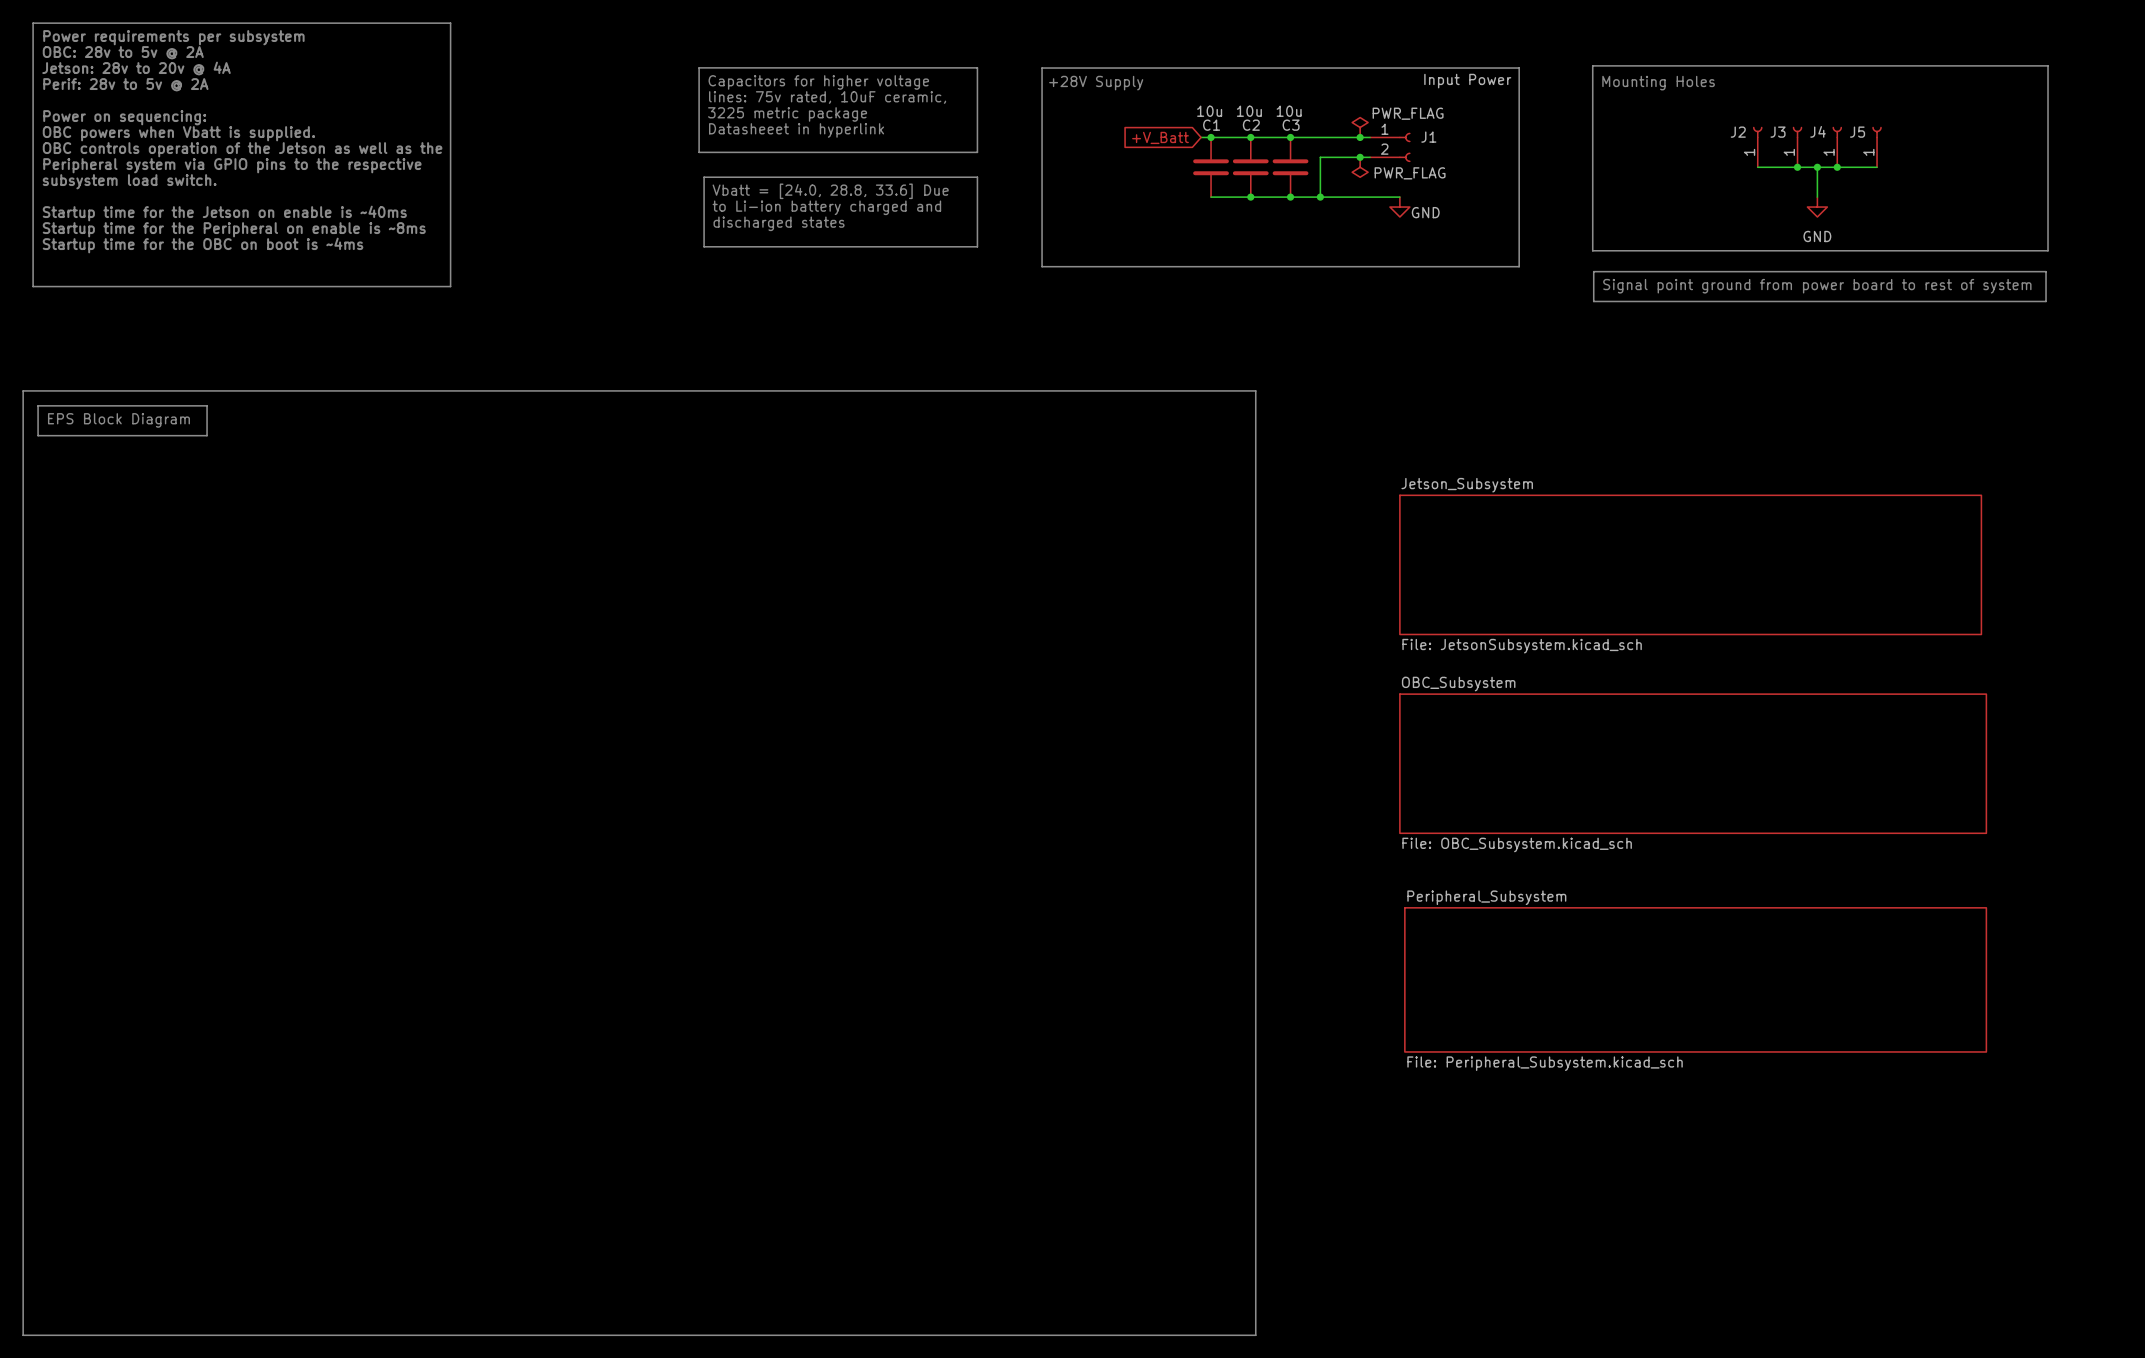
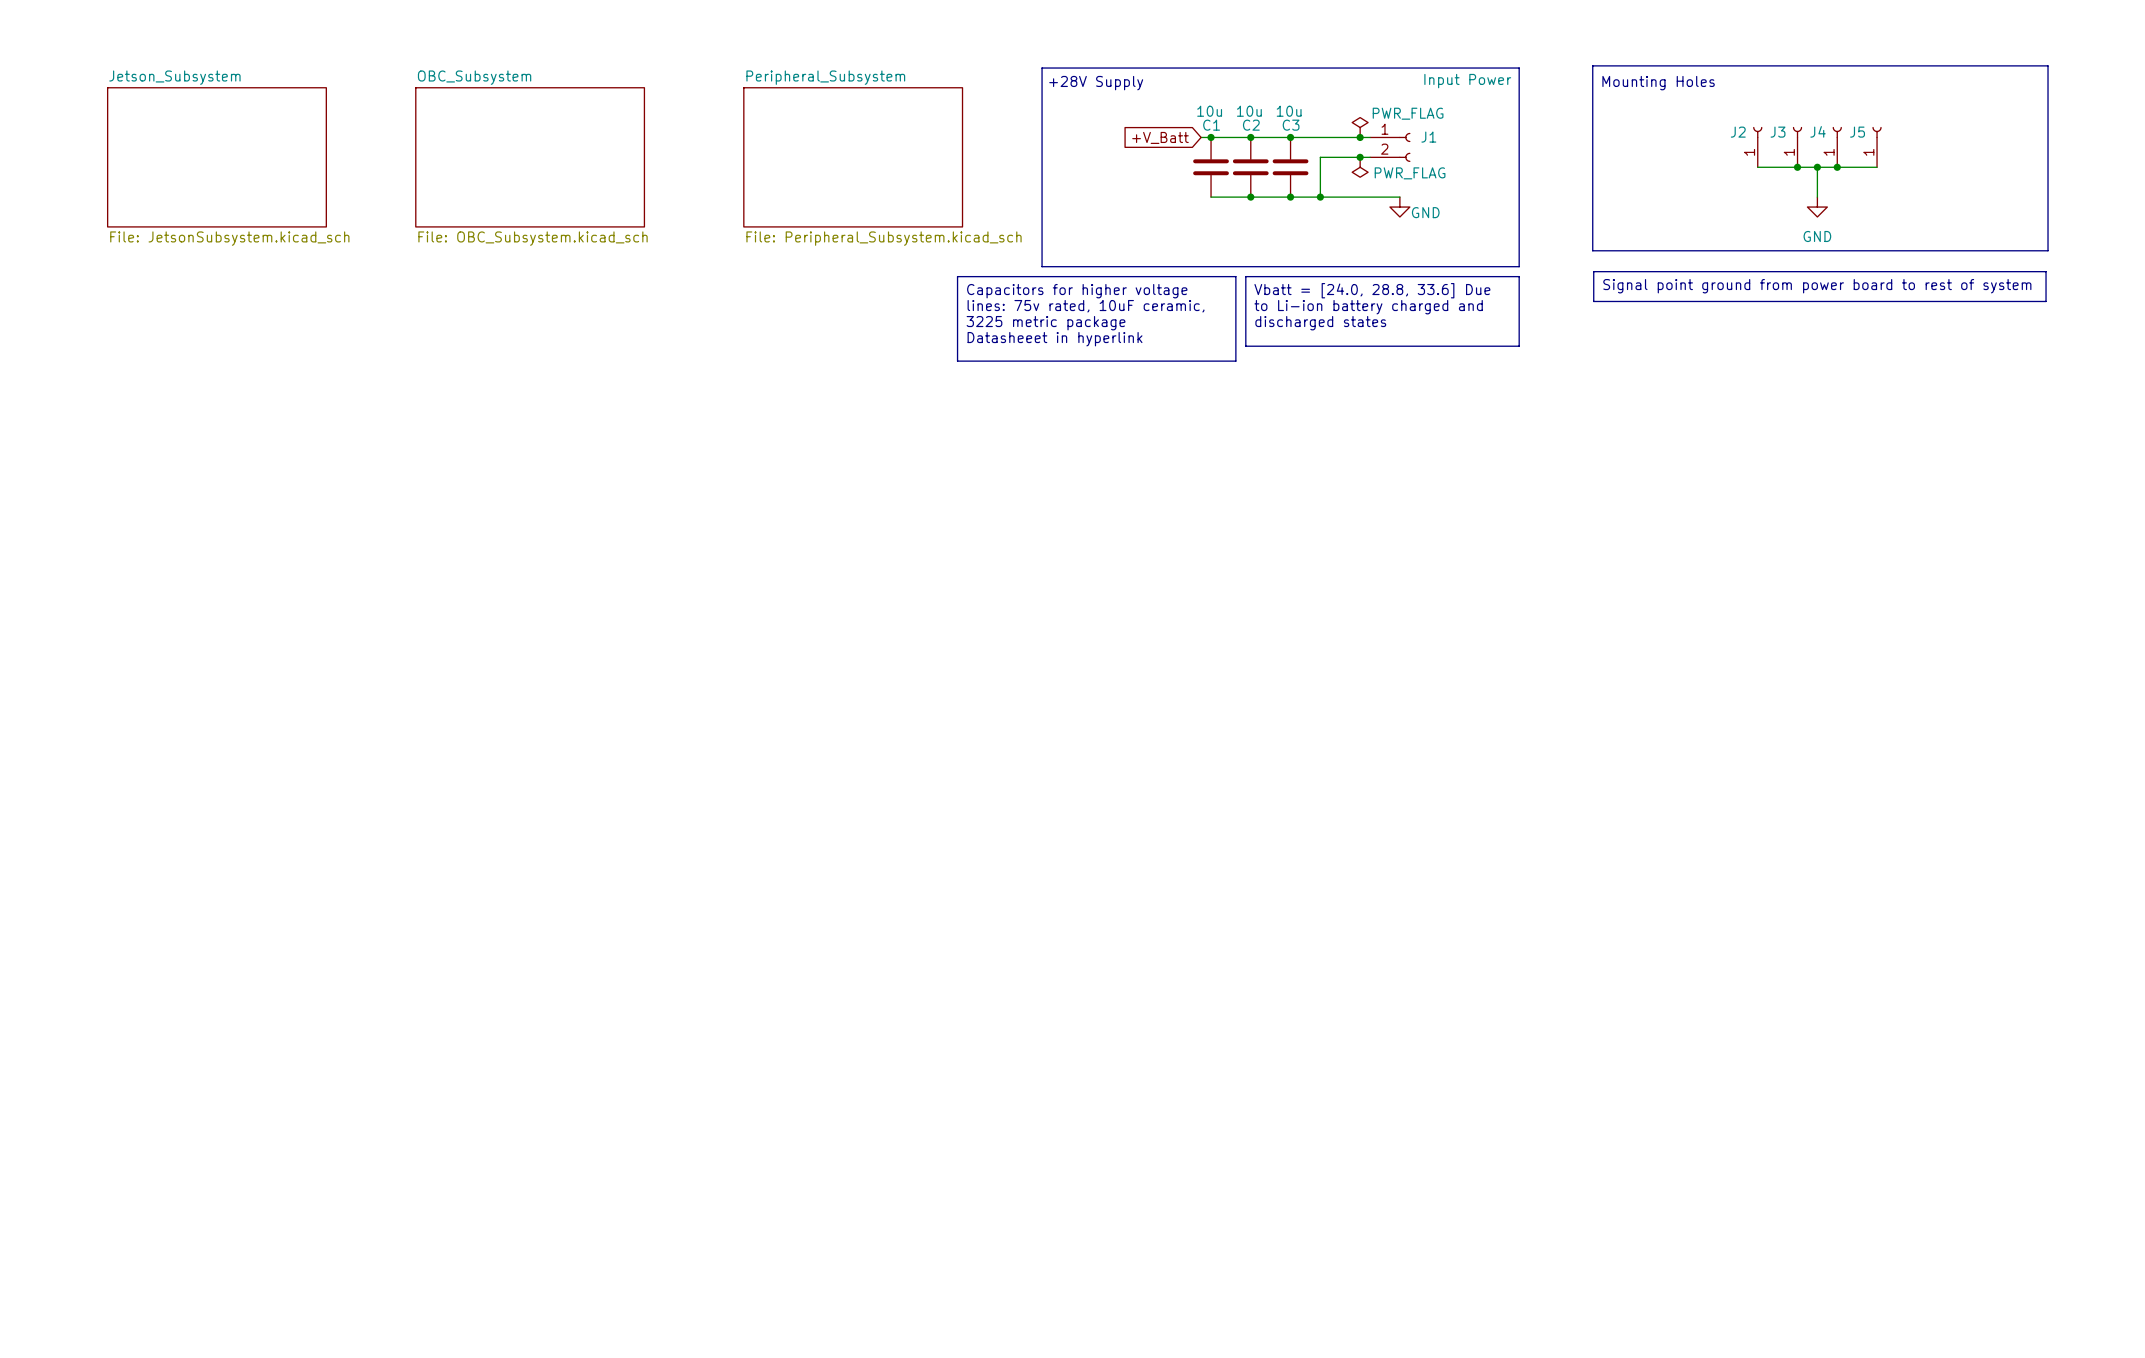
line: (33, 23) (450, 23) (450, 286) (33, 286) (33, 23) -> none
text: Power requirements per subsystem (173, 37) -> none
text: OBC: 28v to 5v @ 2A (123, 52) -> none
line: (699, 67) (977, 67) (977, 152) (699, 152) (699, 67) -> none
text: Jetson: 28v to 20v @ 4A (136, 68) -> none
text: Capacitors for higher voltage (818, 82) -> none
text: Perif: 28v to 5v @ 2A (125, 84) -> none
text: lines: 75v rated, 10uF ceramic, (827, 97) -> none
text: 3225 metric package (787, 114) -> none
text: Power on sequencing: (124, 117) -> none
text: Datasheeet in hyperlink (796, 130) -> none
text: OBC powers when Vbatt is supplied. (178, 133) -> none
text: OBC controls operation of the Jetson as well as the (242, 149) -> none
sheet Jetson_Subsystem: none -> File: JetsonSubsystem.kicad_sch (216, 157)
sheet OBC_Subsystem: none -> File: OBC_Subsystem.kicad_sch (530, 157)
sheet Peripheral_Subsystem: none -> File: Peripheral_Subsystem.kicad_sch (853, 157)
text: Peripheral system via GPIO pins to the respective (232, 165) -> none
line: (704, 177) (977, 177) (977, 246) (704, 246) (704, 177) -> none
text: subsystem load switch. (129, 181) -> none
text: Vbatt = [24.0, 28.8, 33.6] Due (830, 191) -> none
text: to Li-ion battery charged and (826, 207) -> none
text: Startup time for the Jetson on enable is ~40ms (224, 213) -> none
text: discharged states (779, 223) -> none
text: Startup time for the Peripheral on enable is ~8ms (234, 229) -> none
text: Startup time for the OBC on boot is ~4ms (203, 245) -> none
line: none -> (957, 276) (1235, 276) (1235, 361) (957, 361) (957, 276)
line: none -> (1245, 276) (1519, 276) (1519, 346) (1245, 346) (1245, 276)
text: none -> Vbatt = [24.0, 28.8, 33.6] Due (1372, 290)
text: none -> Capacitors for higher voltage (1077, 291)
text: none -> lines: 75v rated, 10uF ceramic, (1086, 306)
text: none -> to Li-ion battery charged and (1368, 307)
text: none -> 3225 metric package (1046, 323)
text: none -> discharged states (1320, 323)
text: none -> Datasheeet in hyperlink (1055, 339)
line: (23, 390) (1255, 390) (1255, 1335) (23, 1335) (23, 390) -> none
line: (38, 405) (207, 405) (207, 435) (38, 435) (38, 405) -> none
text: EPS Block Diagram (118, 420) -> none
sheet Jetson_Subsystem: File: JetsonSubsystem.kicad_sch (1690, 564) -> none
sheet OBC_Subsystem: File: OBC_Subsystem.kicad_sch (1693, 763) -> none
sheet Peripheral_Subsystem: File: Peripheral_Subsystem.kicad_sch (1695, 979) -> none

